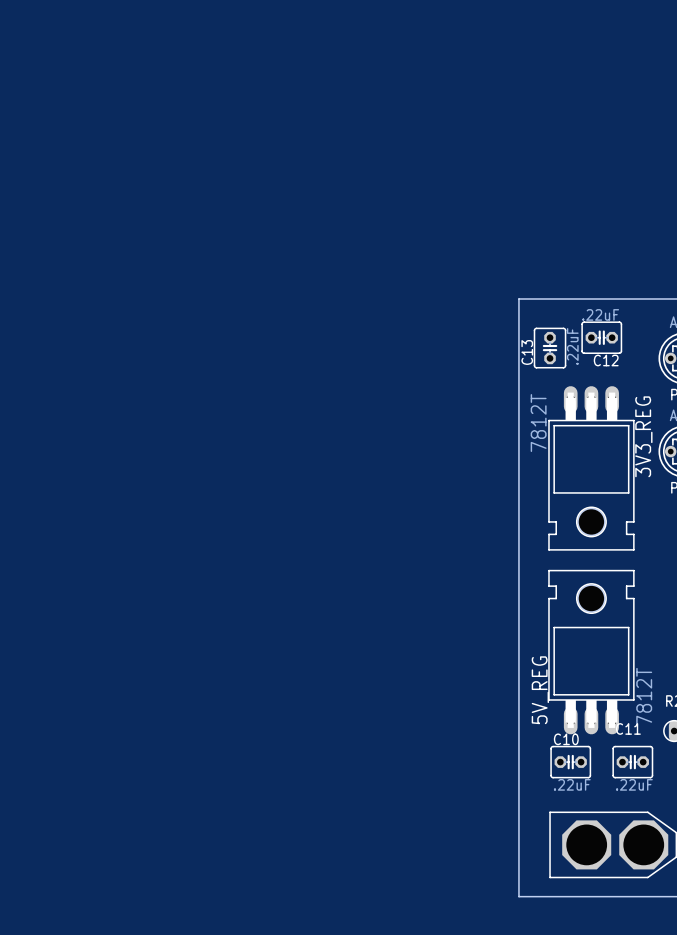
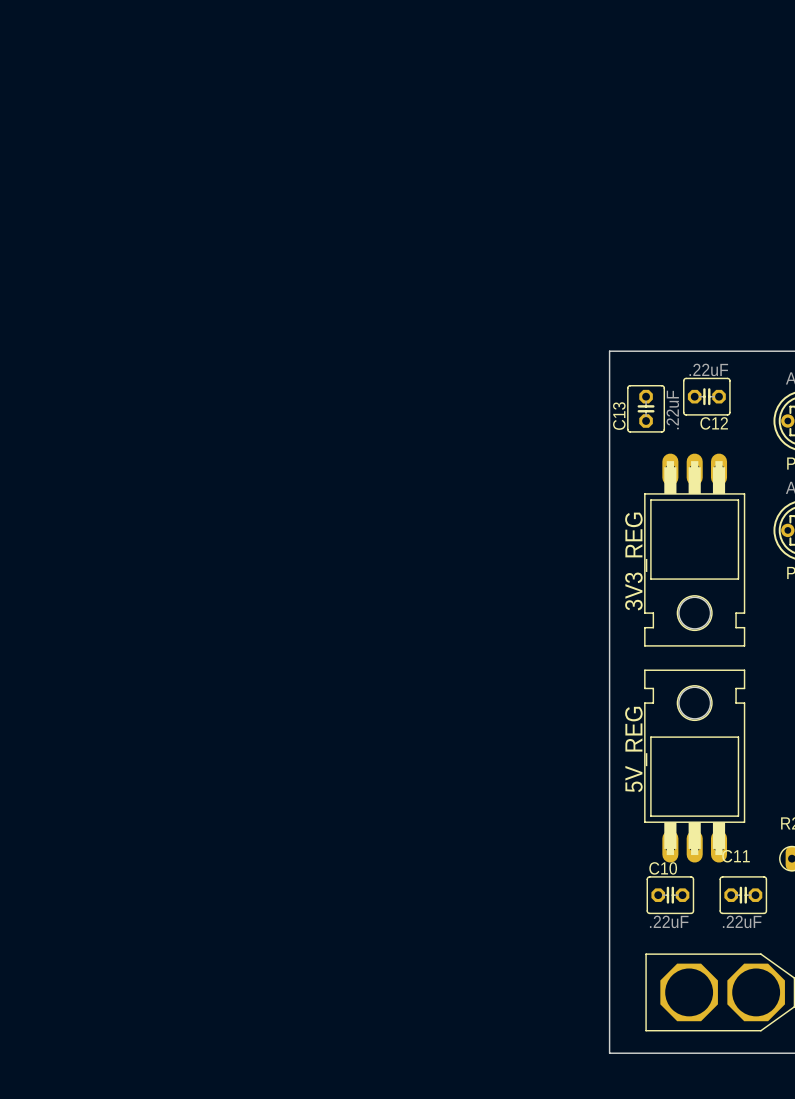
3V3_REG value: 7812T (538, 423) -> none
3V3_REG name position: 3V3_REG (643, 436) -> 3V3_REG (636, 561)
5V_REG name position: 5V_REG (540, 690) -> 5V_REG (636, 749)
5V_REG value: 7812T (644, 696) -> none

